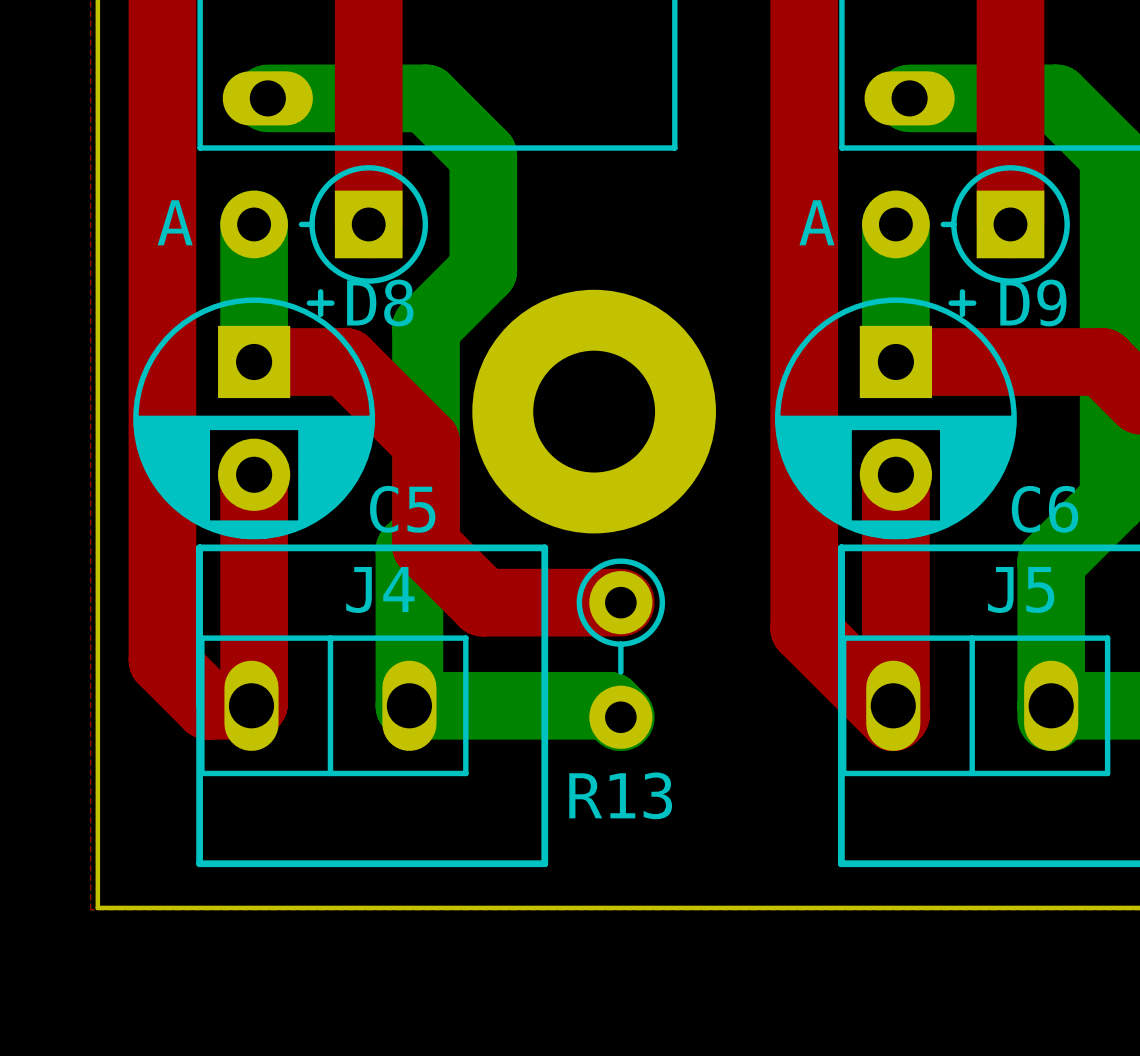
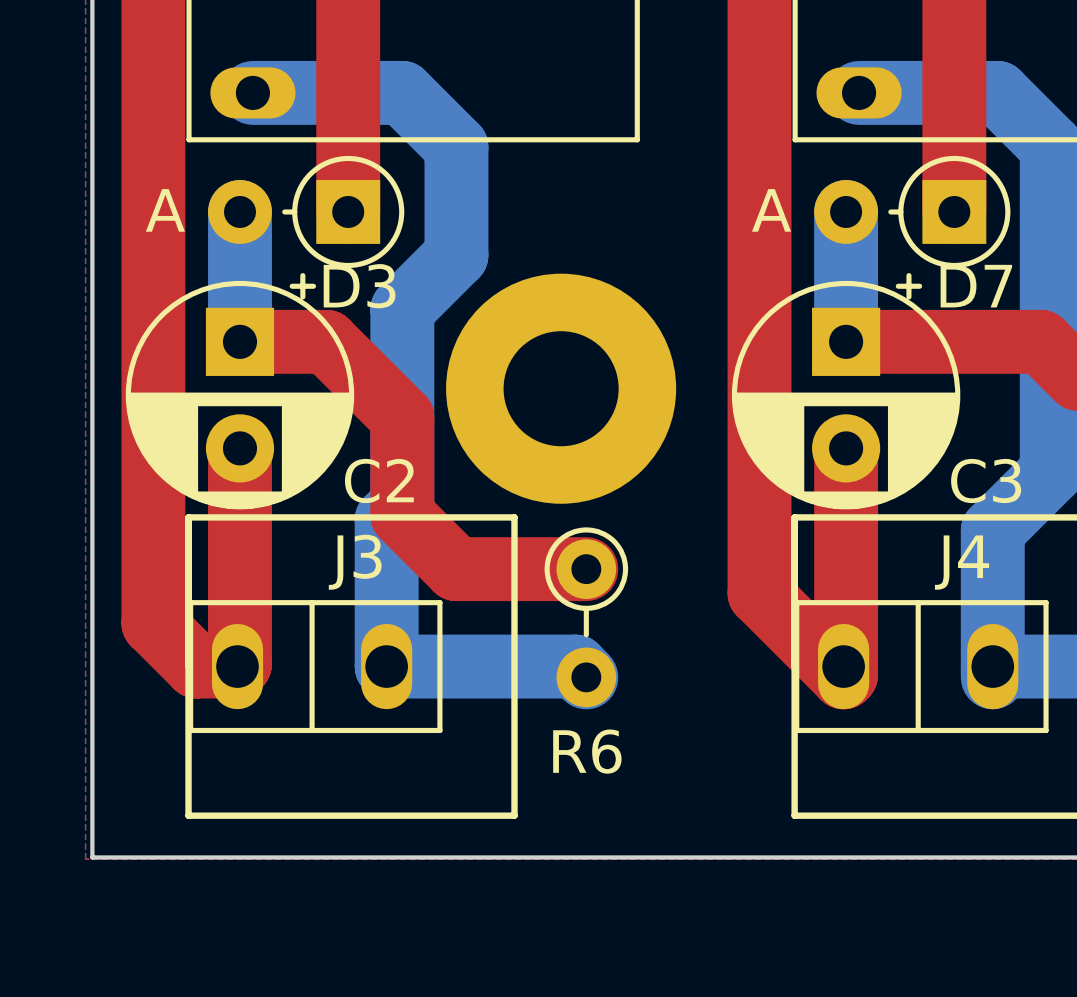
D8 name: D8 (380, 303) -> D3 (359, 286)
D9 name: D9 (1033, 303) -> D7 (976, 286)
C5 name: C5 (402, 509) -> C2 (379, 481)
C6 name: C6 (1044, 509) -> C3 (986, 481)
J4 name: J4 (380, 589) -> J3 (355, 562)
J5 name: J5 (1021, 589) -> J4 (962, 562)
R13 name: R13 (620, 795) -> R6 (587, 751)

